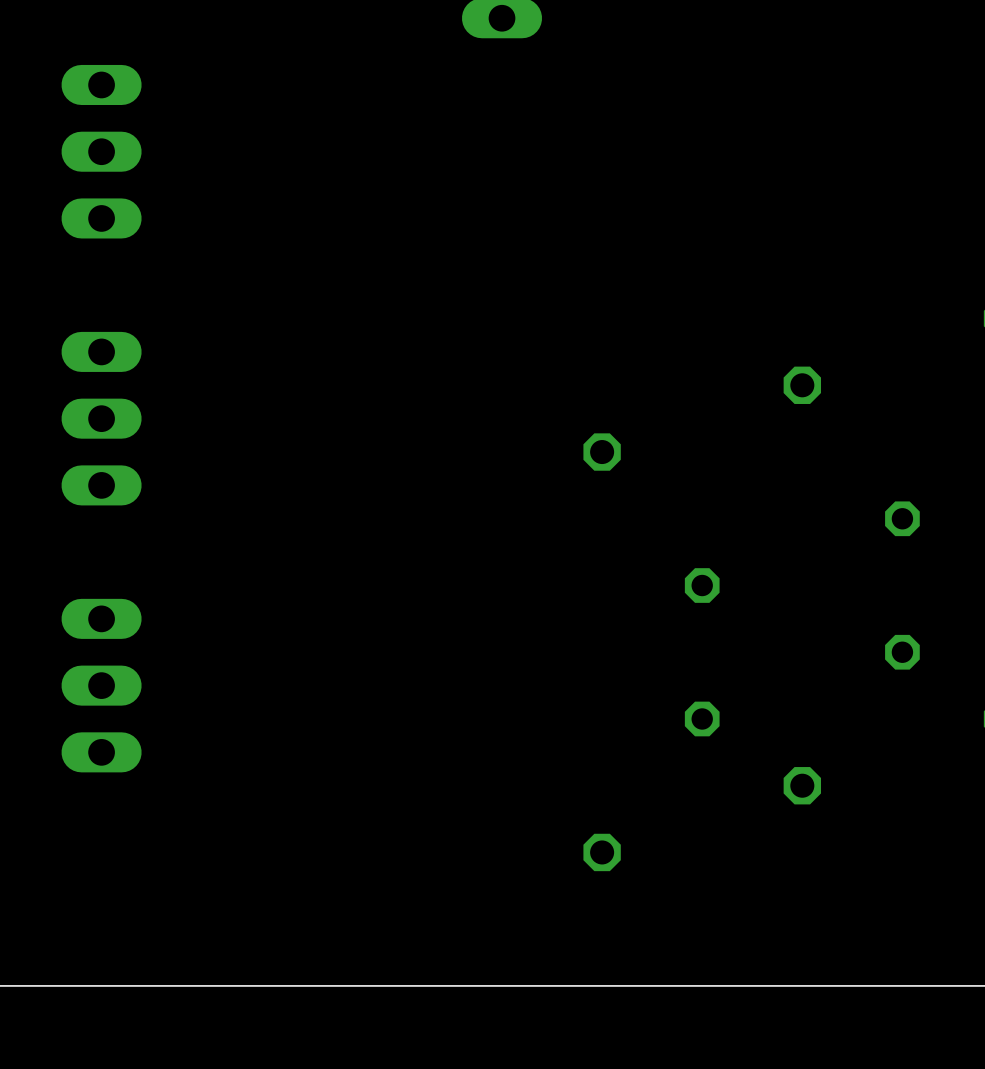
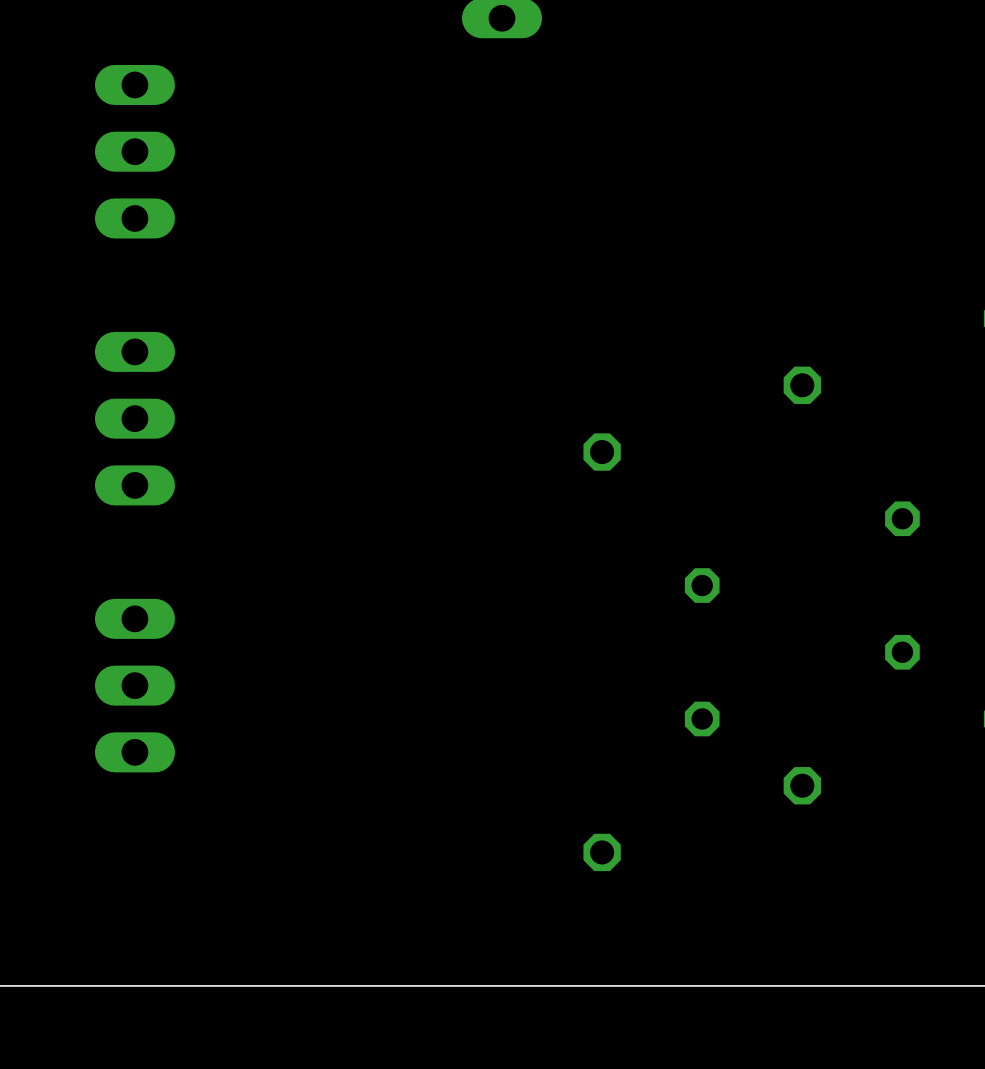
part position: (101, 151) -> (134, 151)
part position: (101, 418) -> (134, 418)
part position: (101, 685) -> (134, 685)

